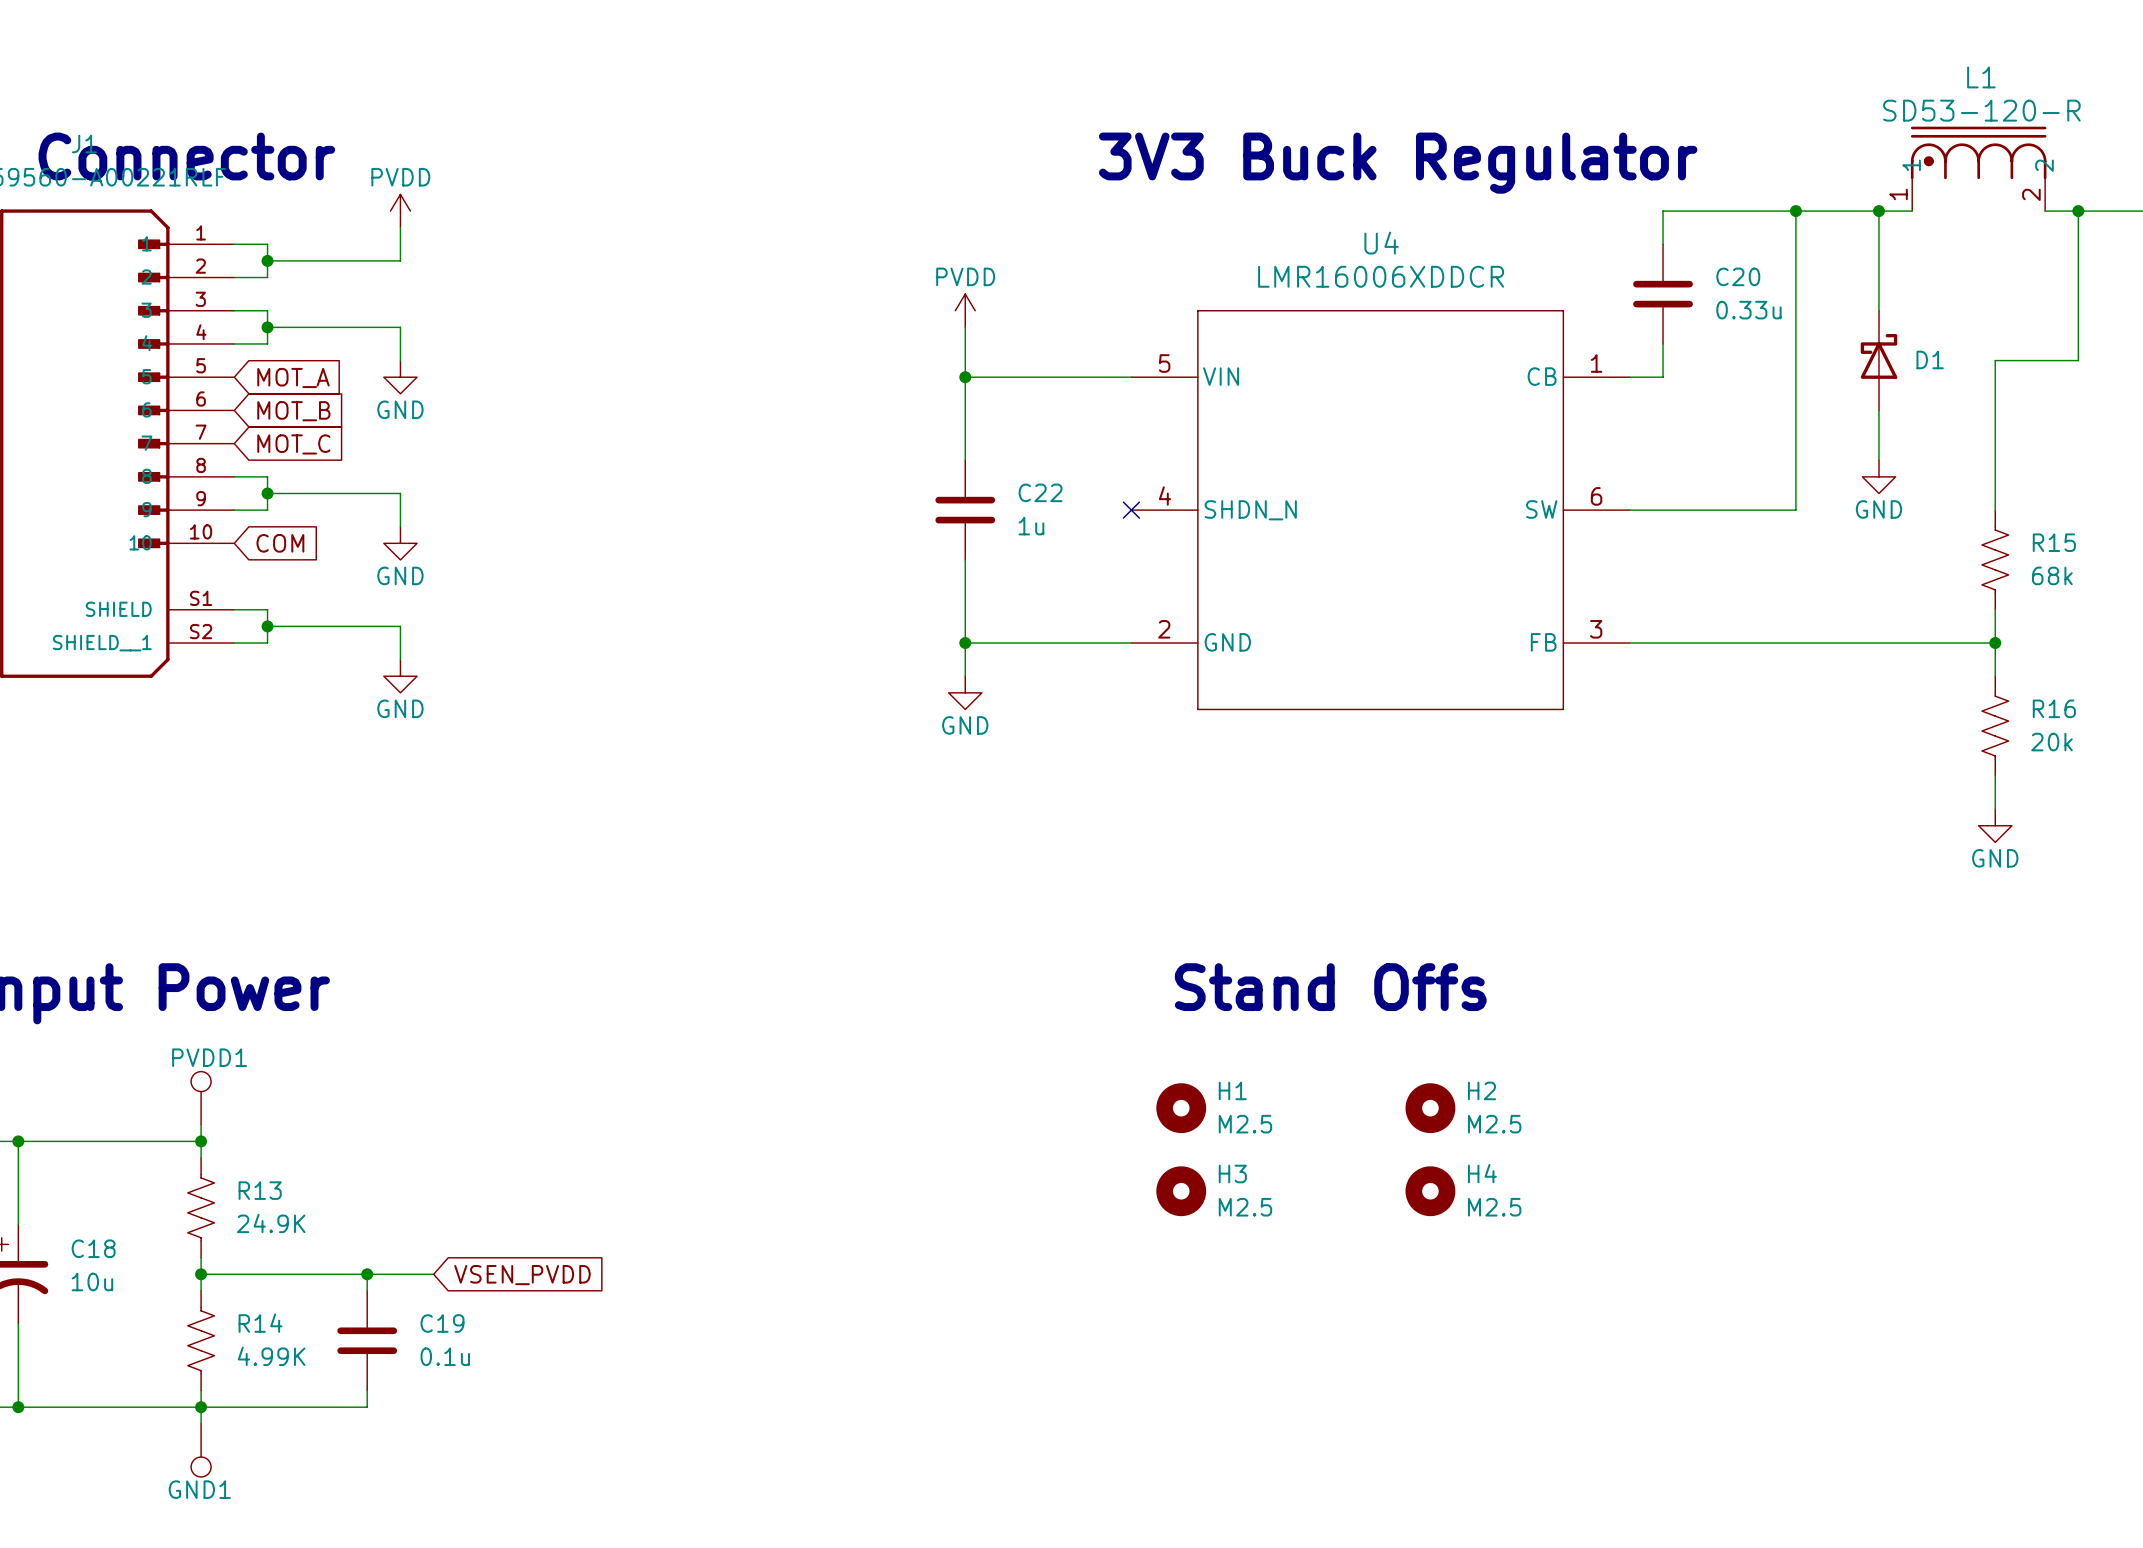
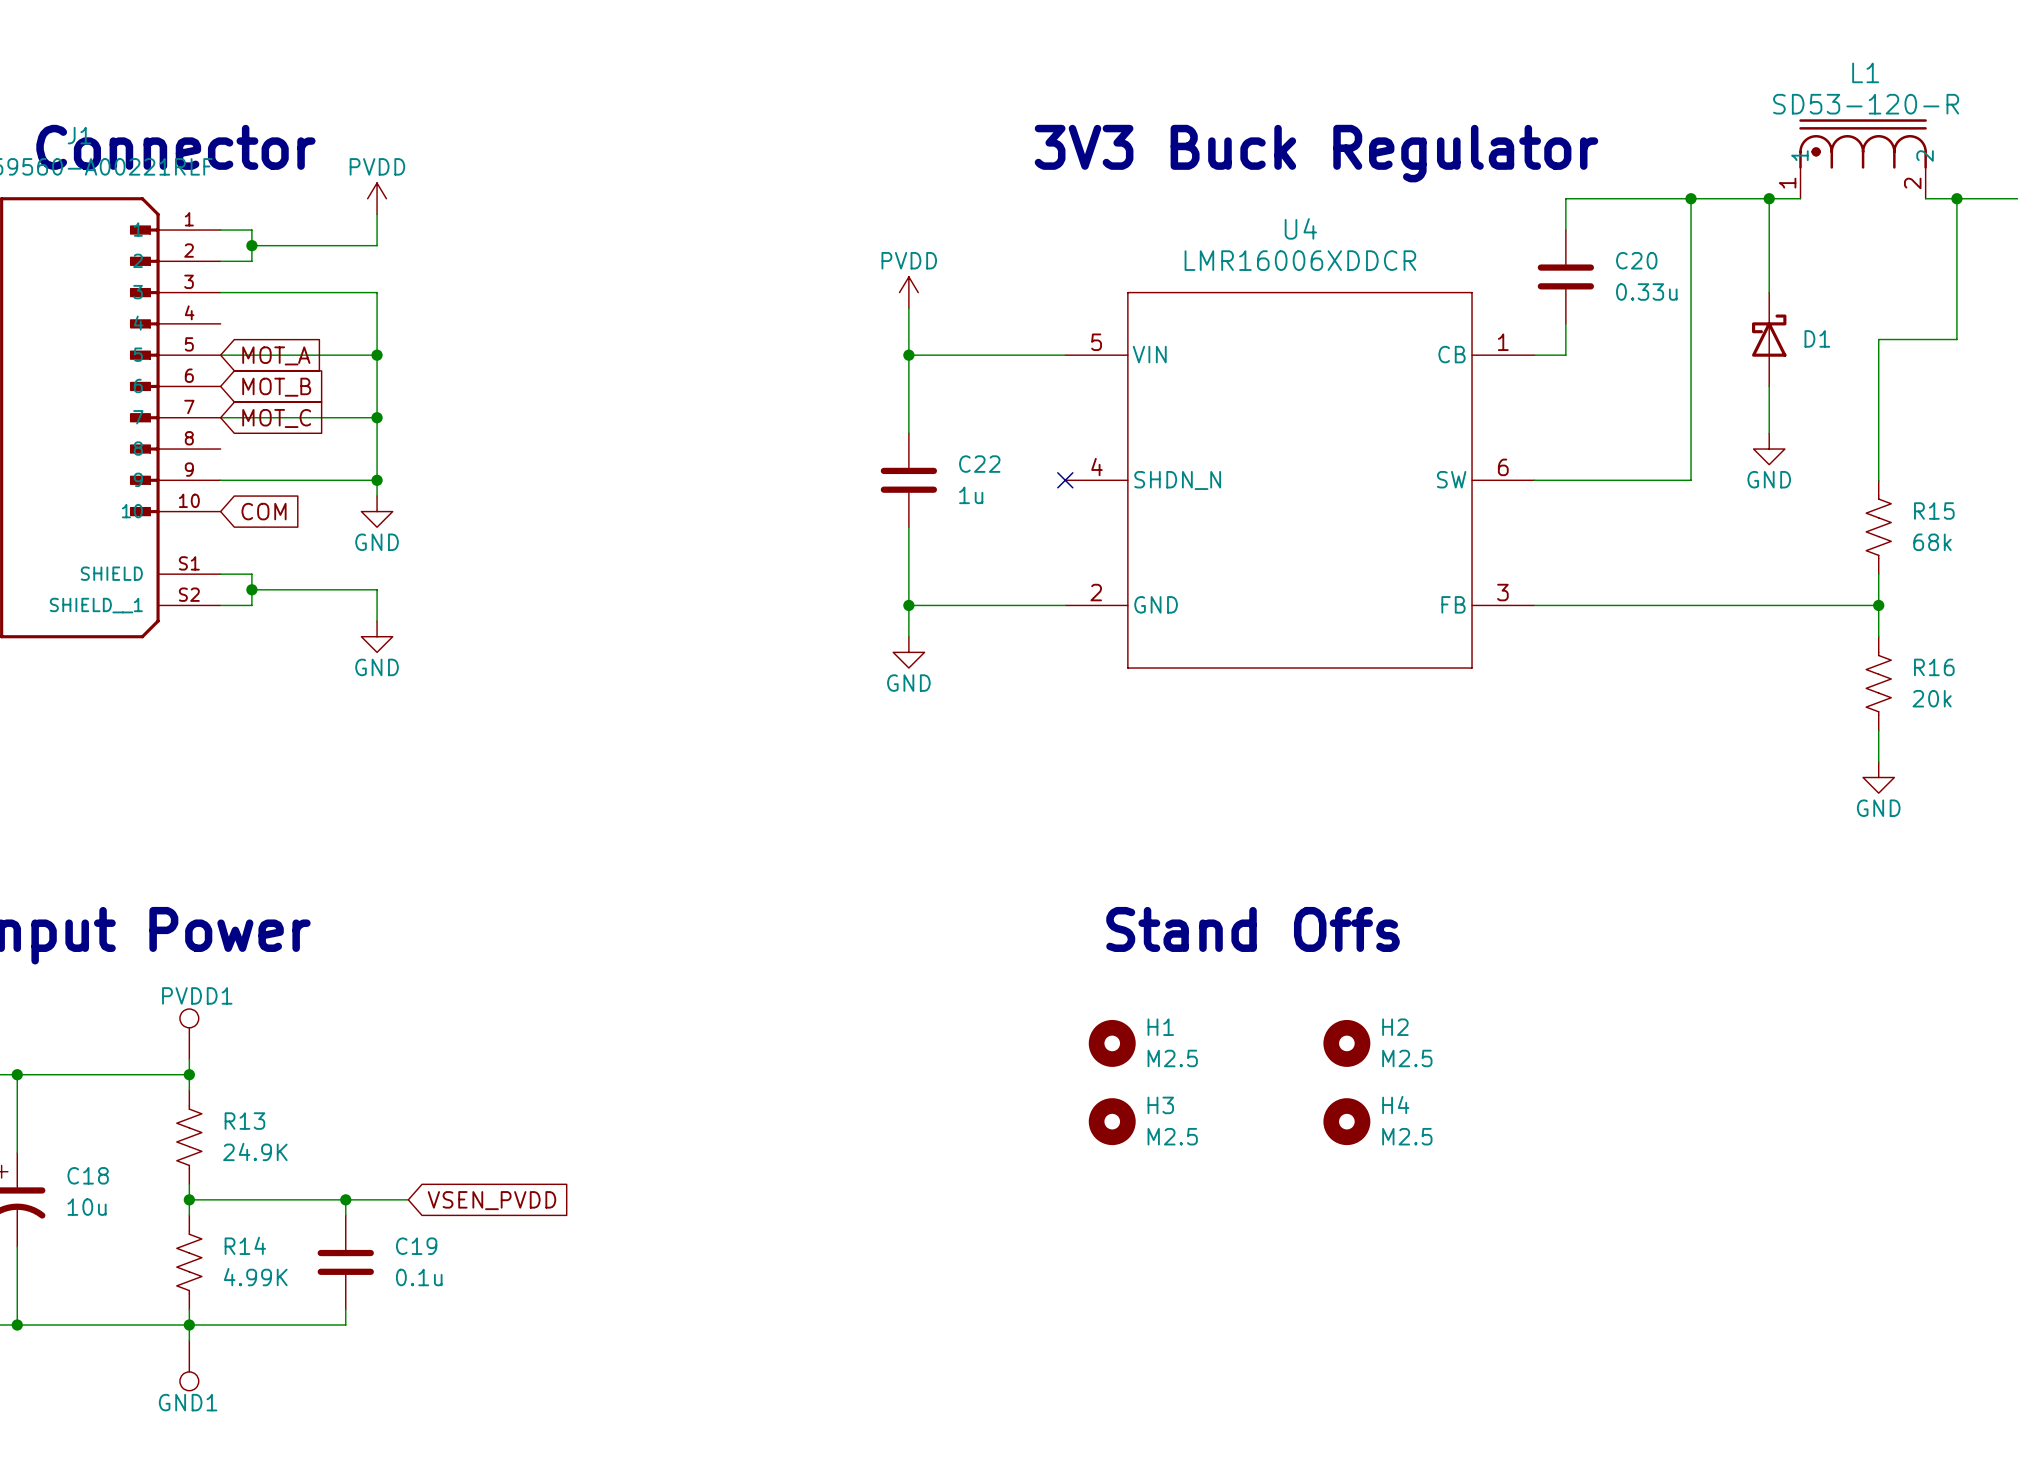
wire: (267, 310) (267, 343) (234, 343) -> none
wire: (267, 327) (400, 327) -> (251, 292) (377, 292) (377, 308)
junction: (267, 327) -> none
wire: none -> (220, 355) (377, 355)
junction: none -> (377, 355)
power symbol: GND (400, 377) -> none
wire: none -> (220, 417) (377, 417)
junction: none -> (377, 417)
wire: (234, 476) (267, 476) (267, 510) -> (377, 480) (251, 480)
wire: (267, 493) (400, 493) -> (377, 339) (377, 464)
junction: (267, 493) -> none
junction: none -> (377, 480)

